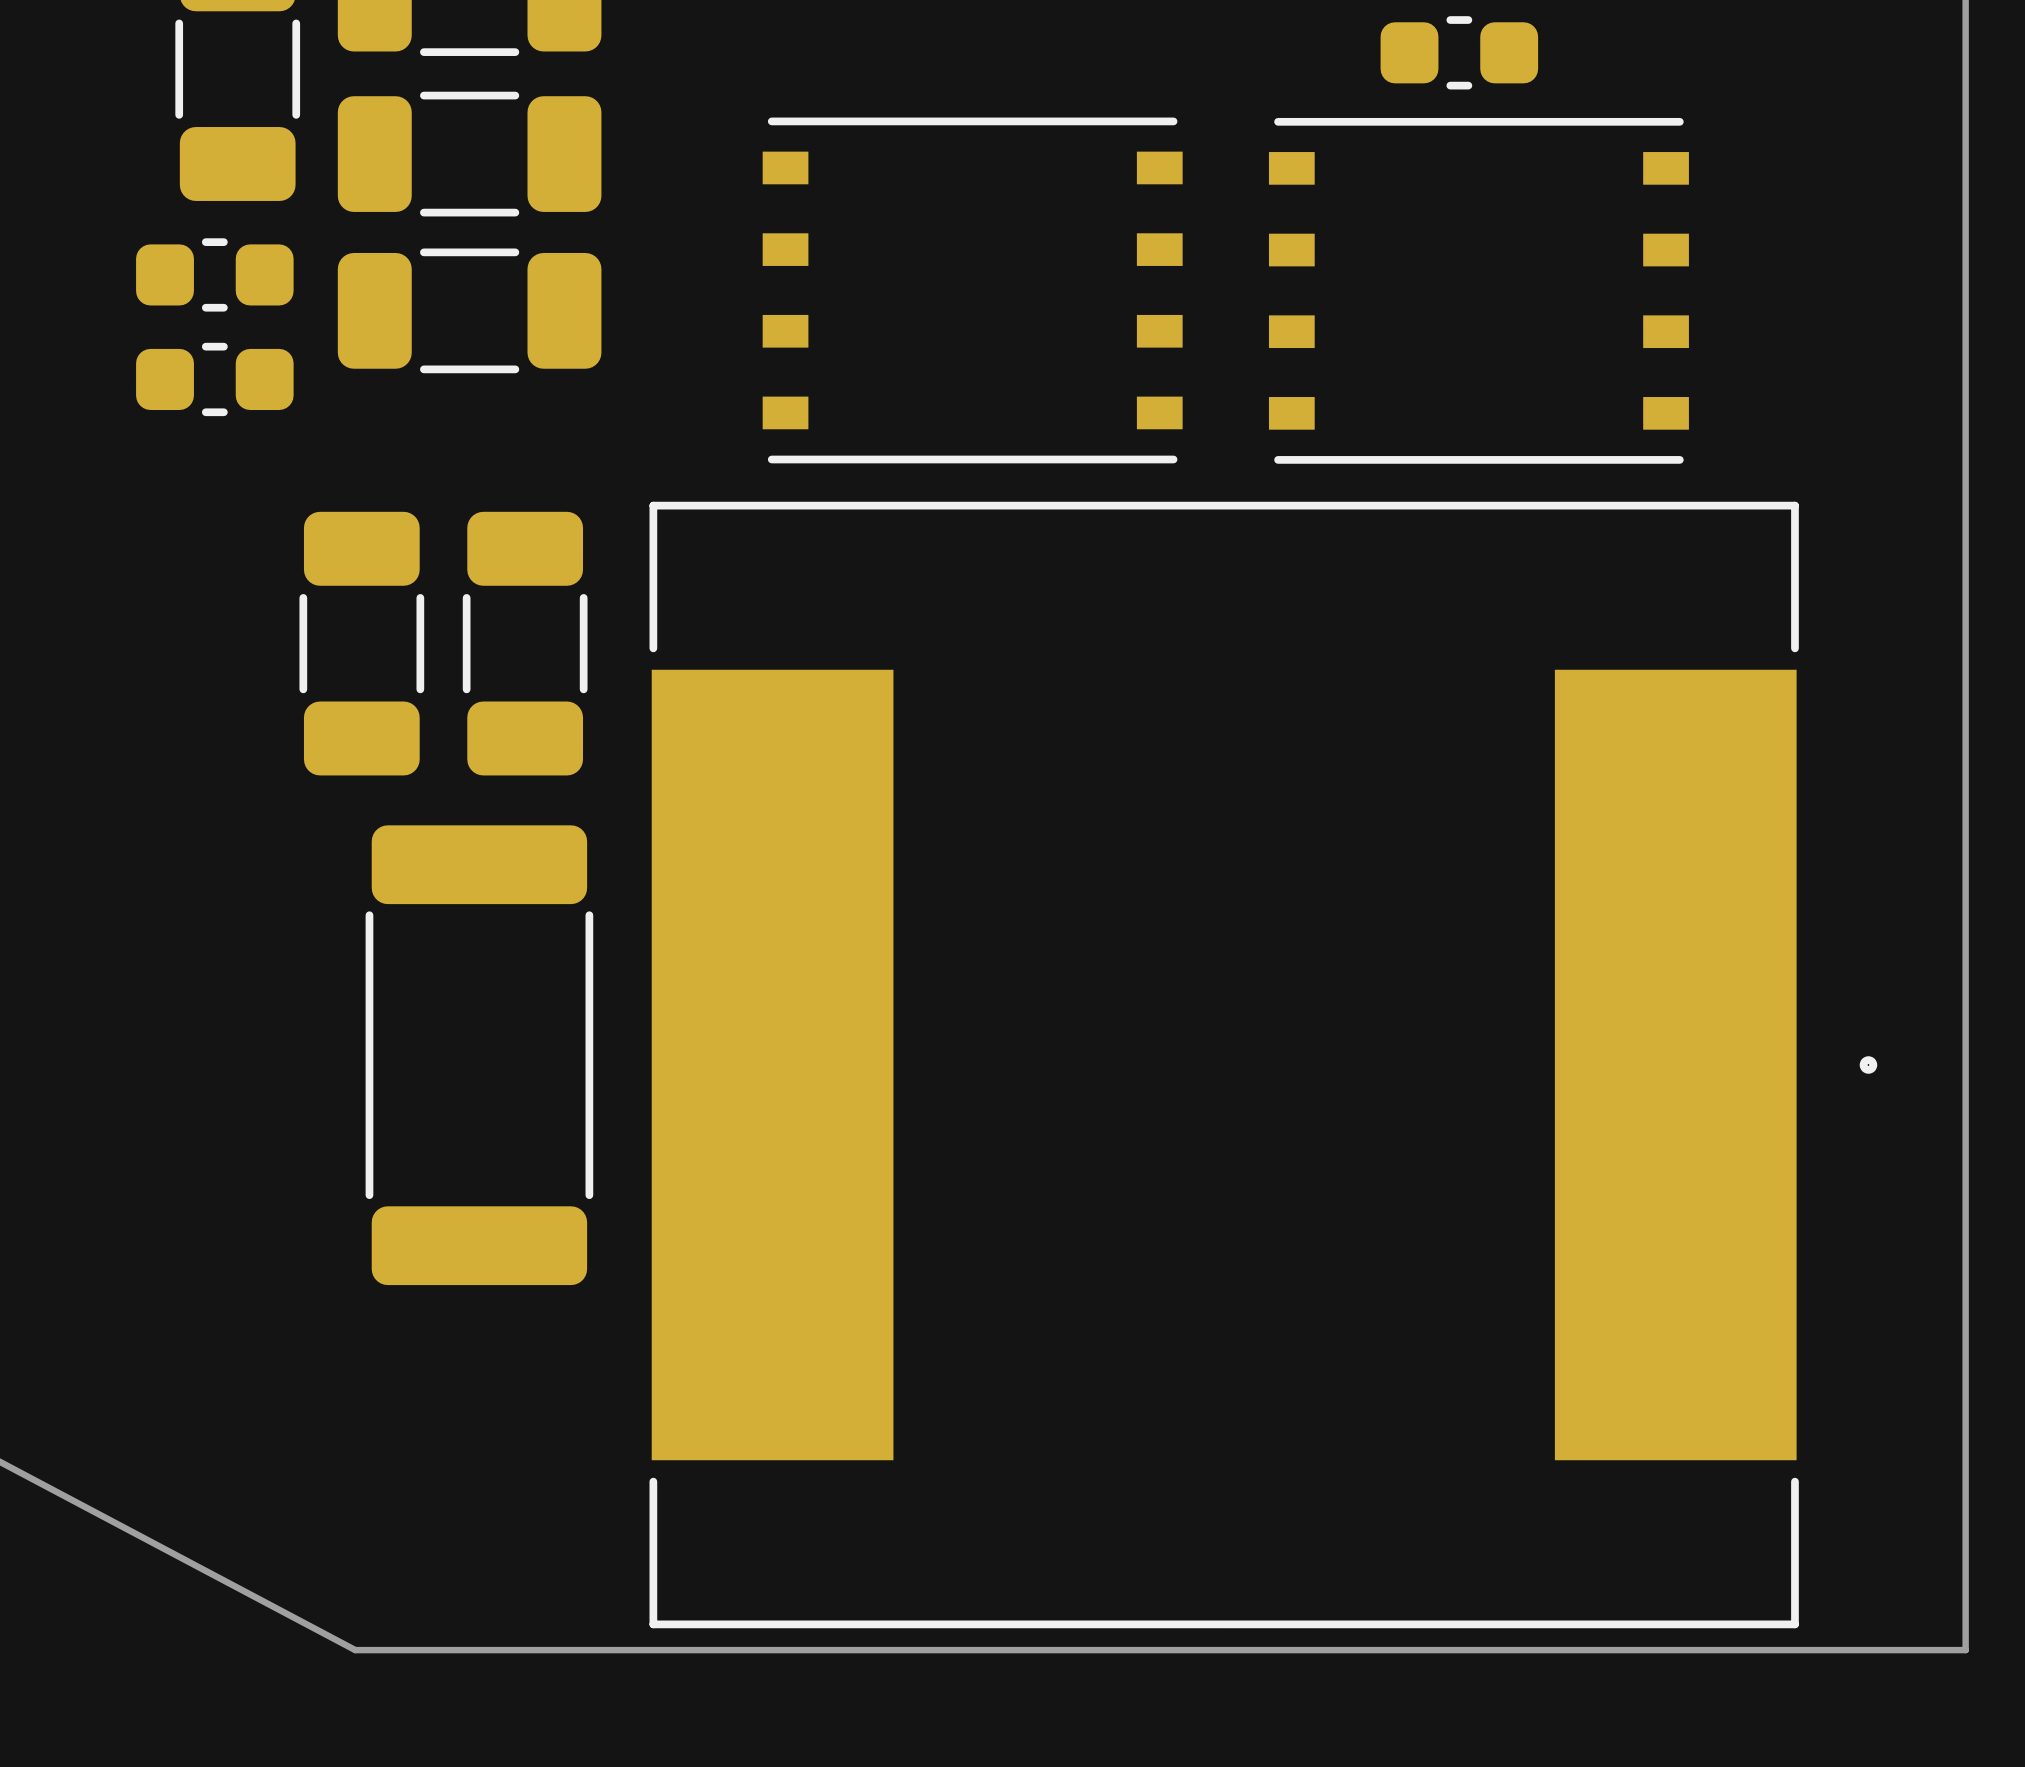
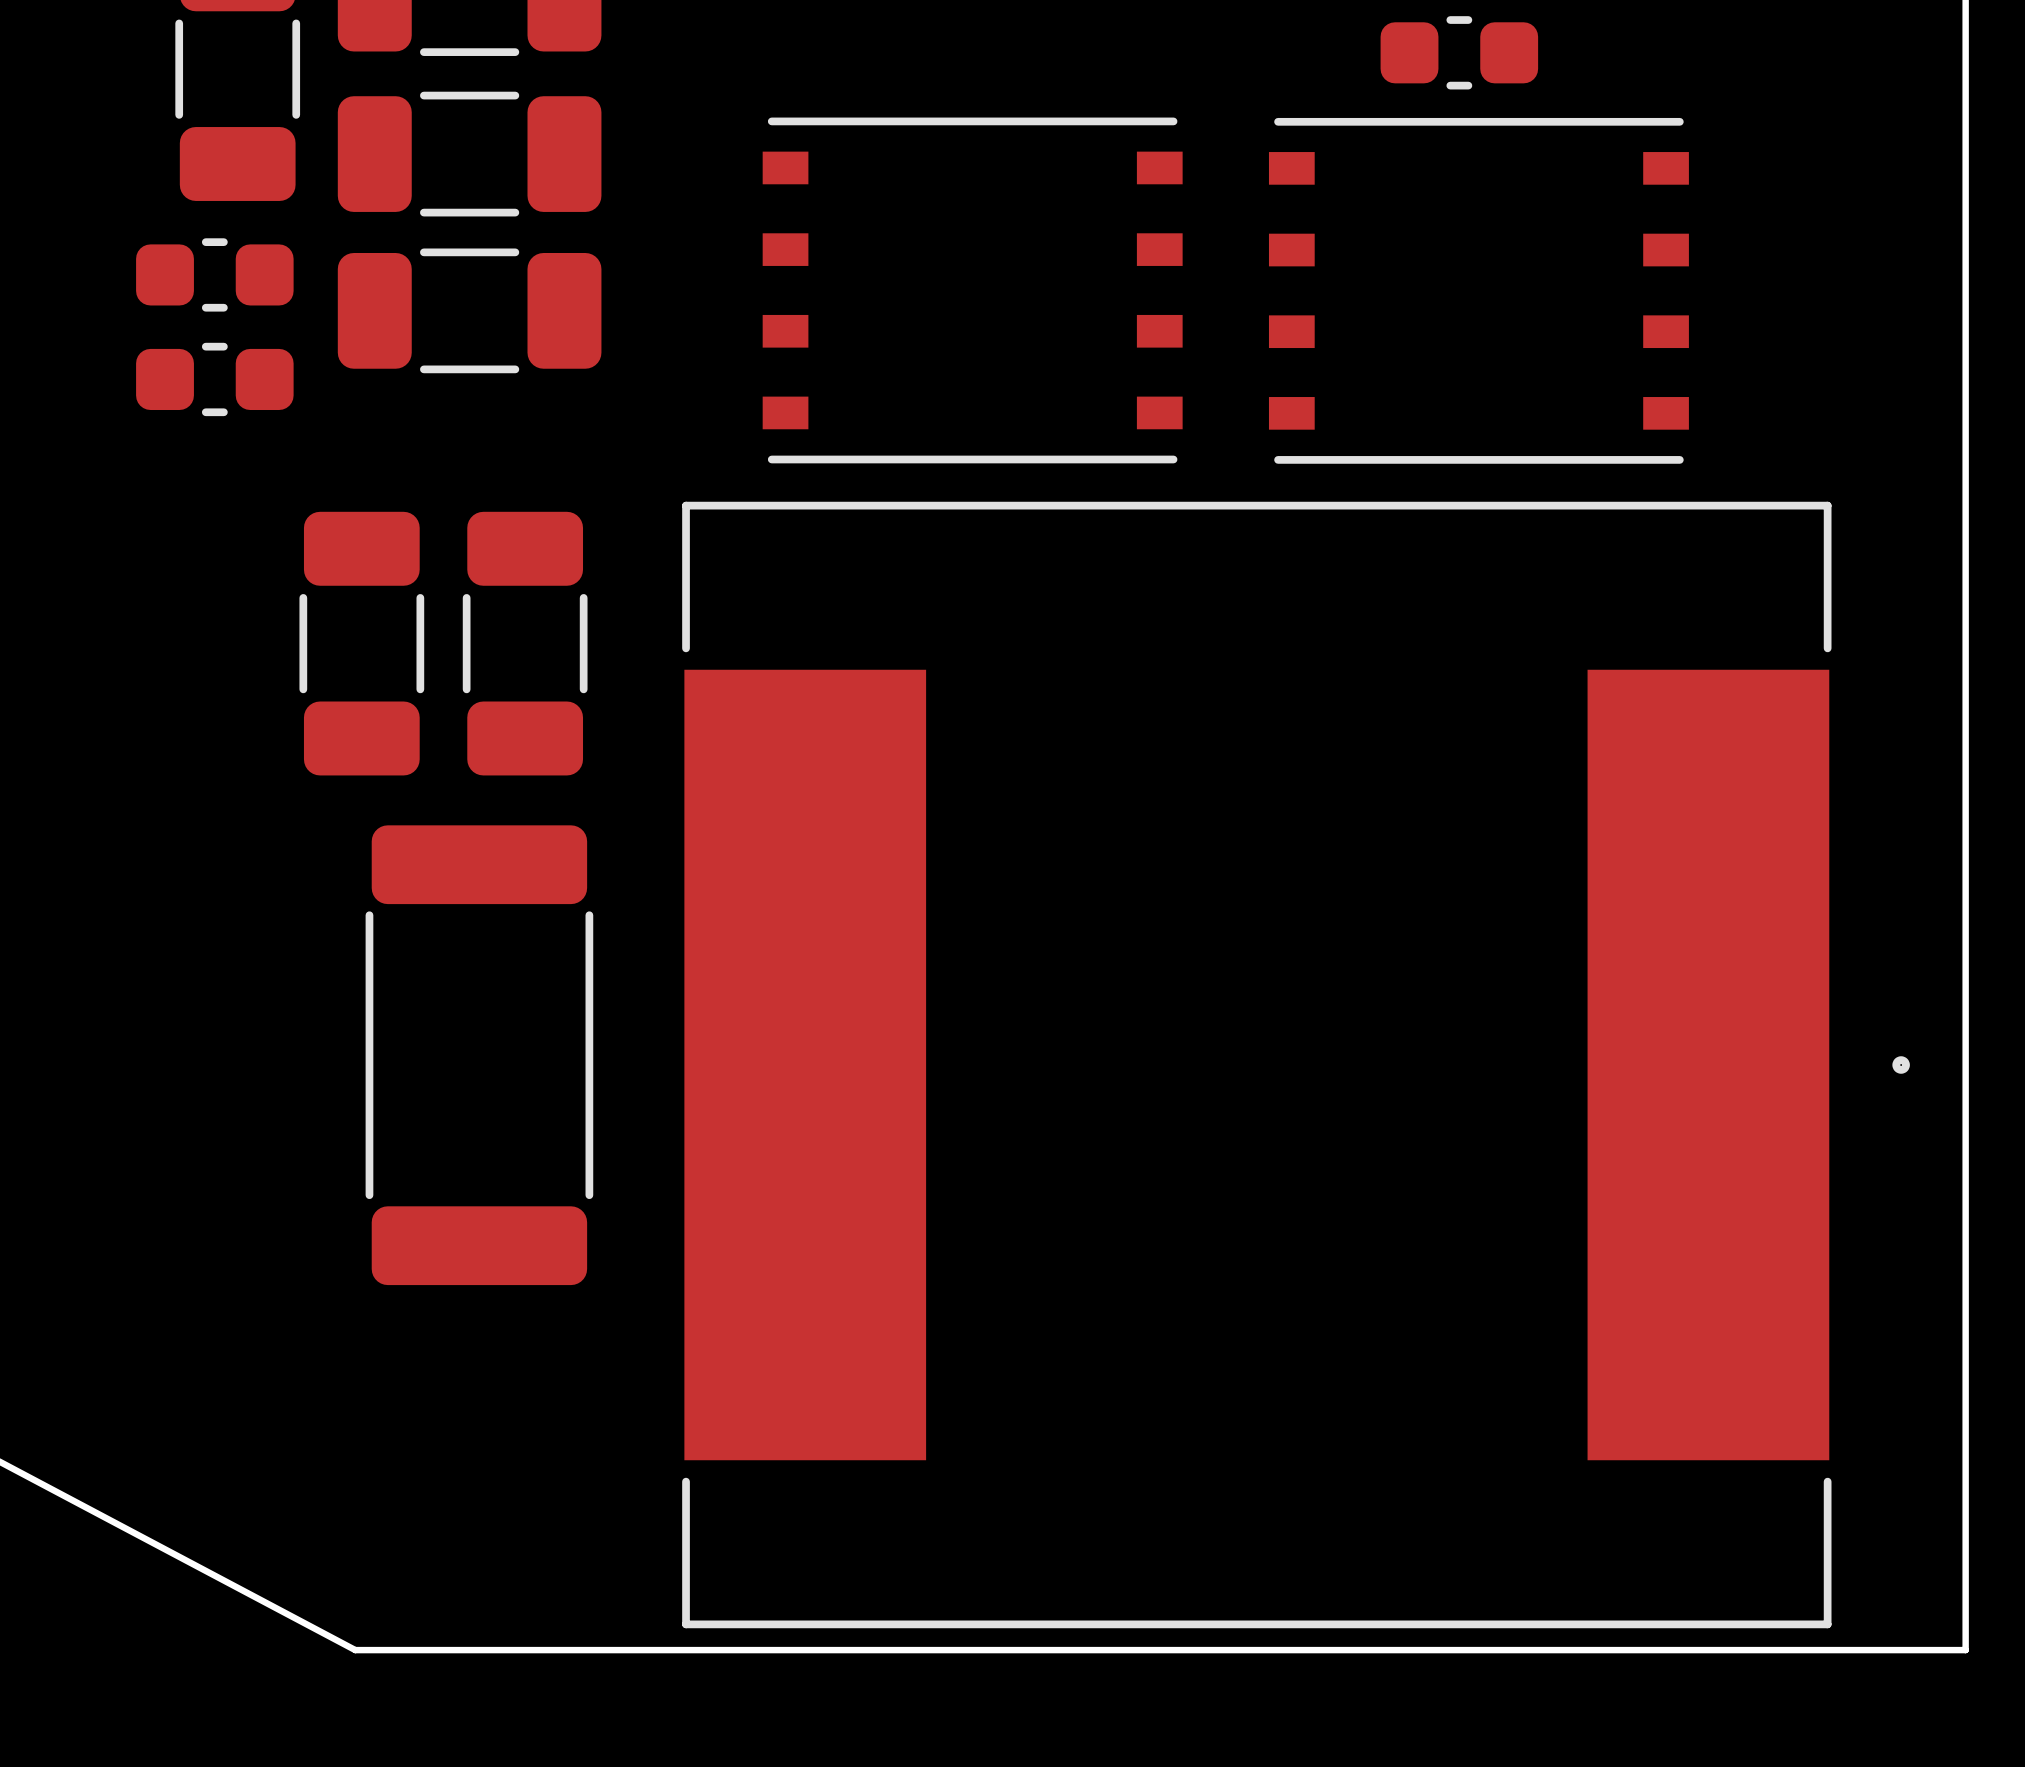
part position: (1263, 1065) -> (1296, 1065)

